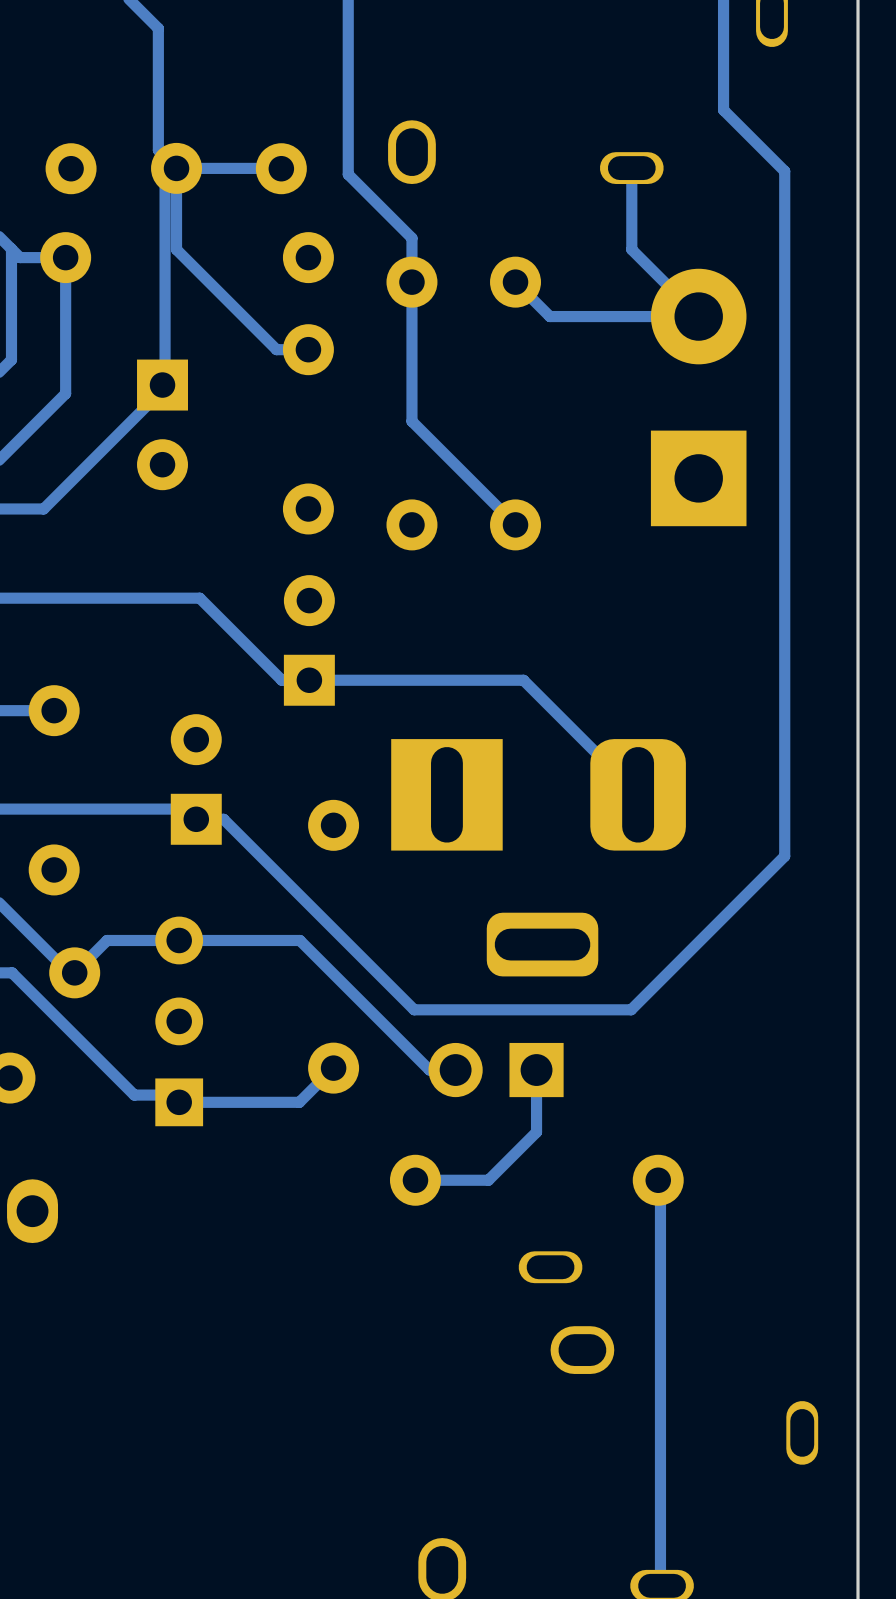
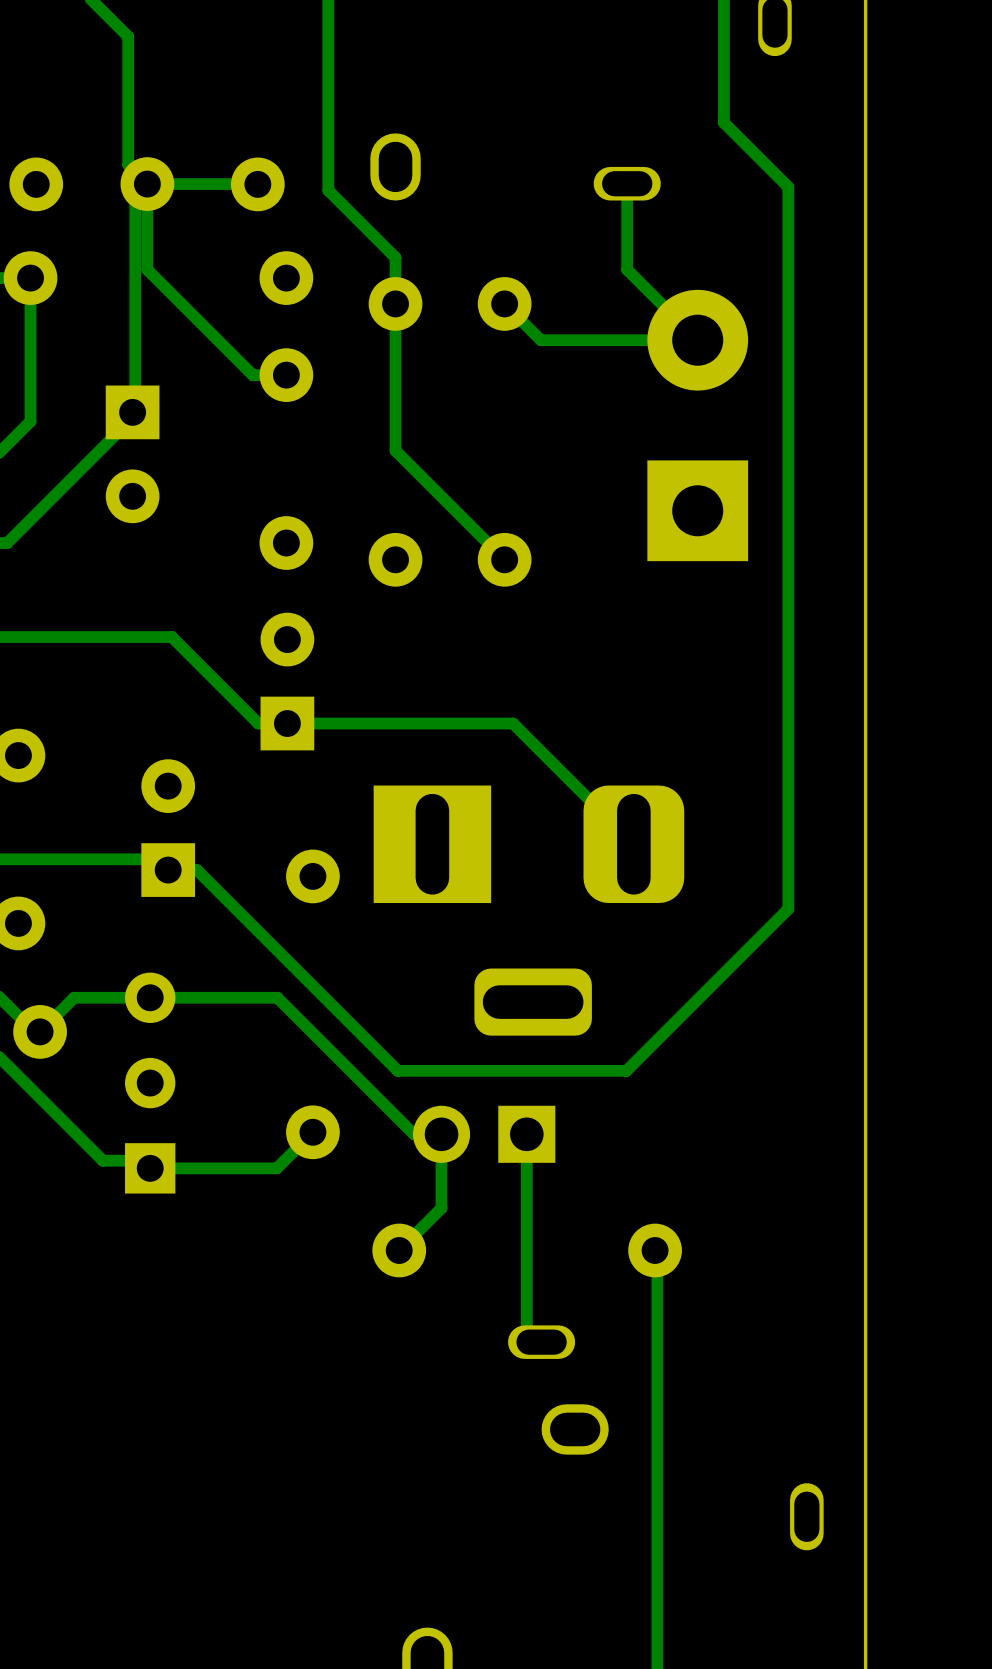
track: (536, 1132) (488, 1180) (415, 1180) -> (441, 1134) (441, 1208) (399, 1250)
track: none -> (526, 1199) (526, 1327) (541, 1342)

